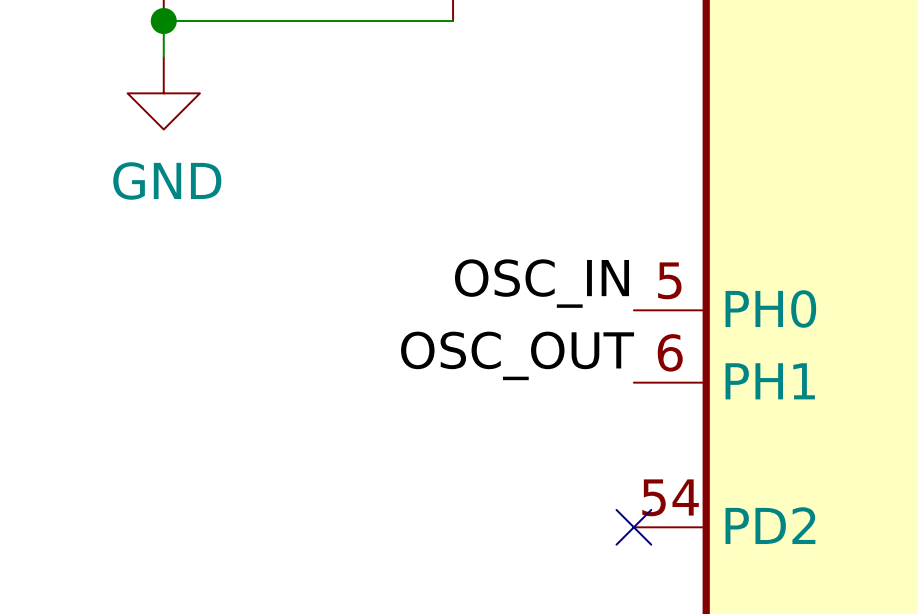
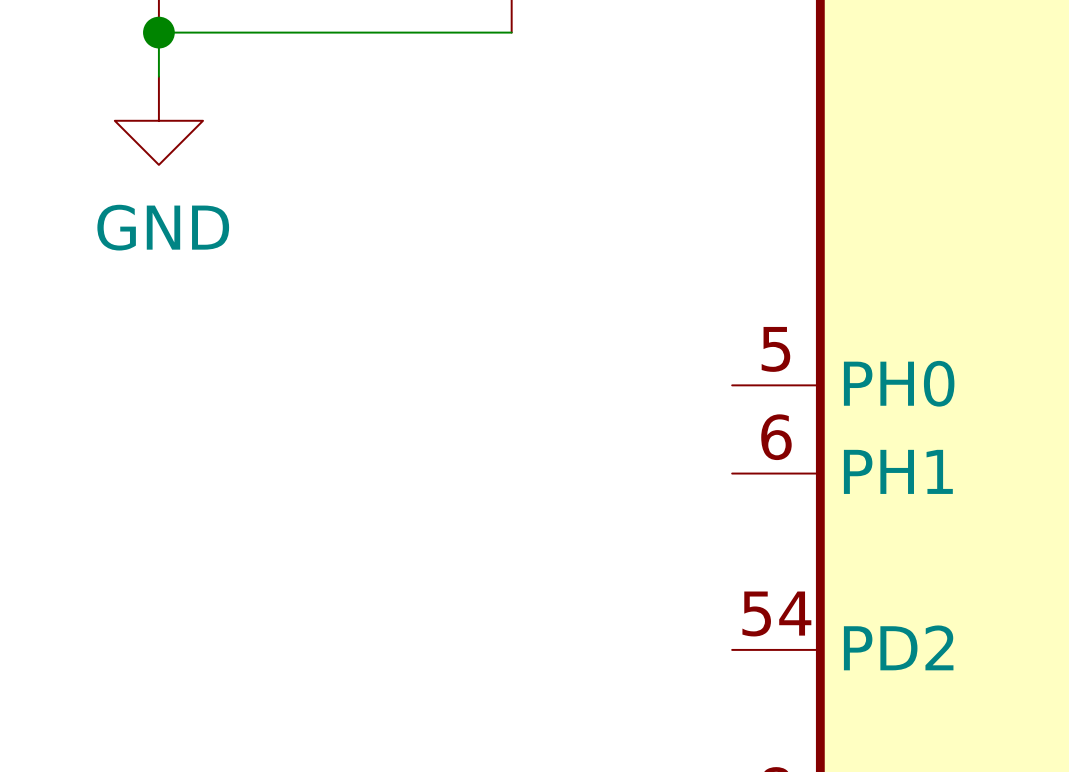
label: OSC_IN (541, 283) -> none
label: OSC_OUT (517, 355) -> none
no-connect mark: (633, 527) -> none

